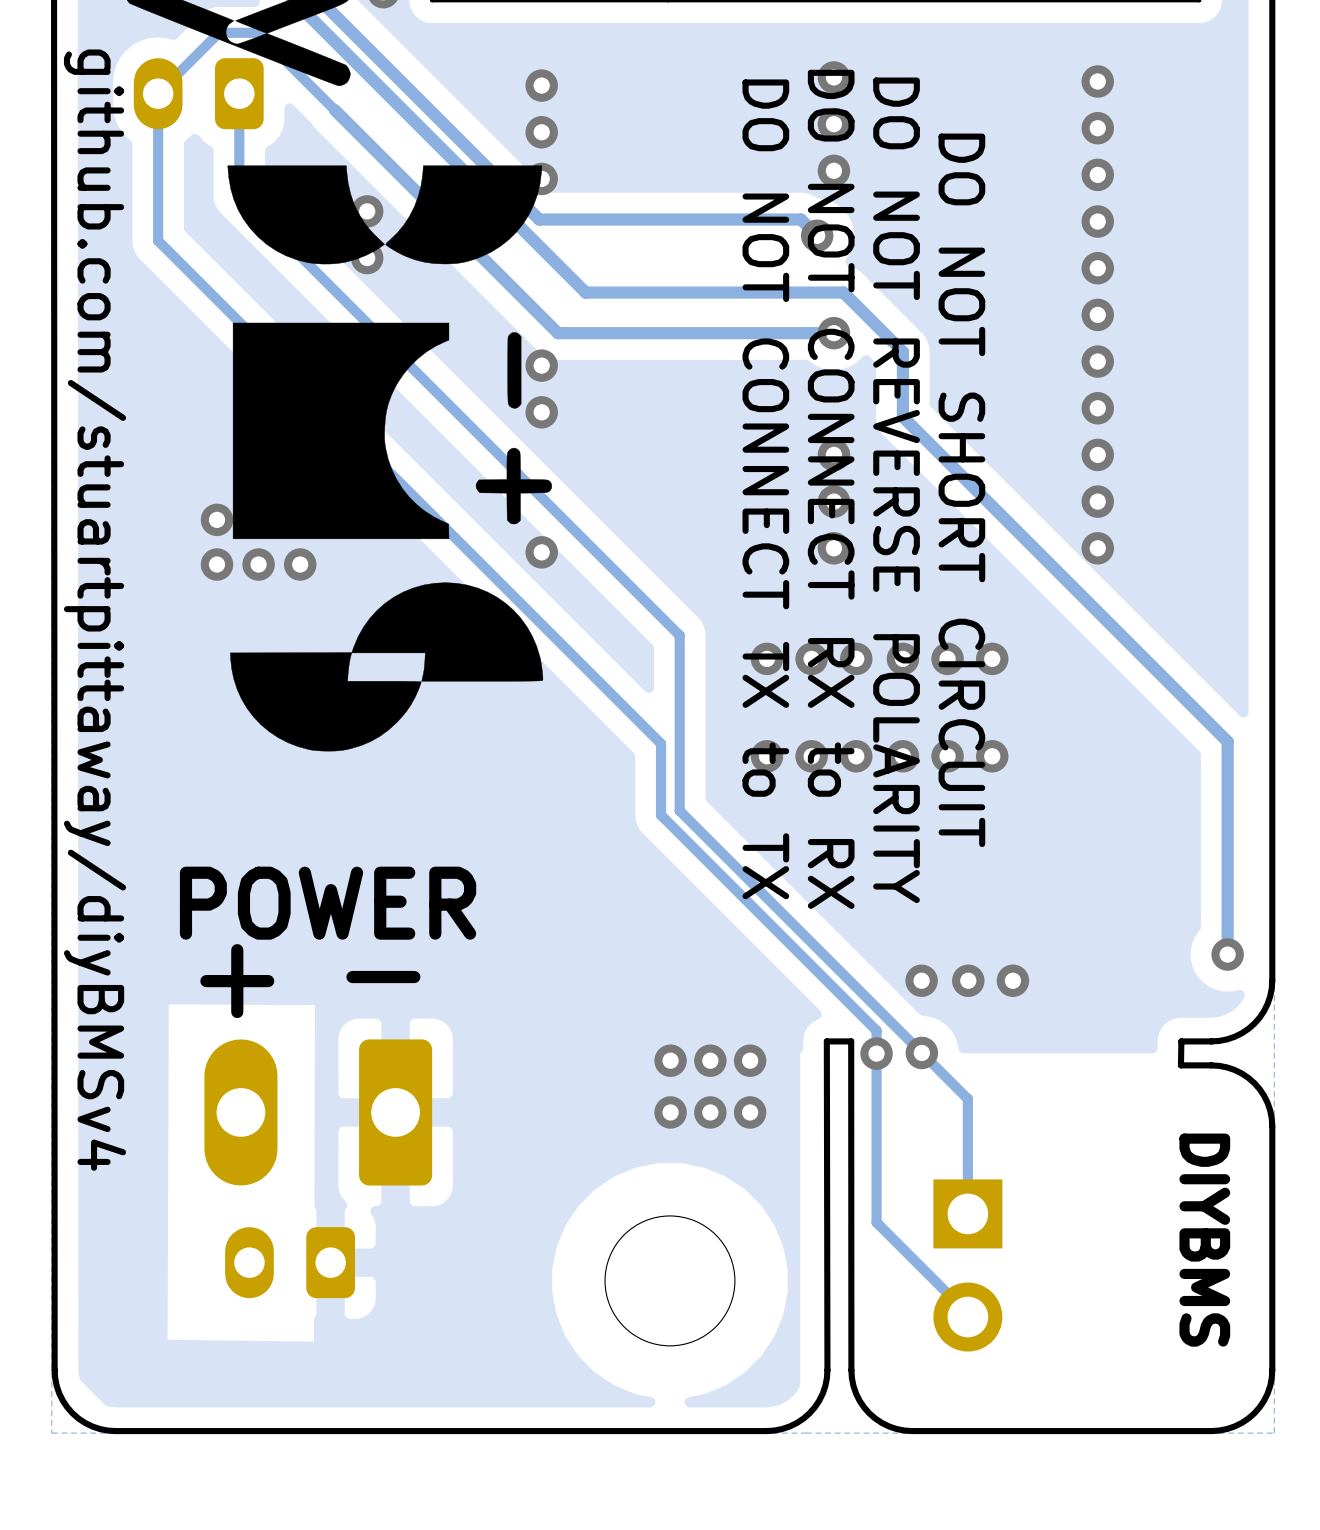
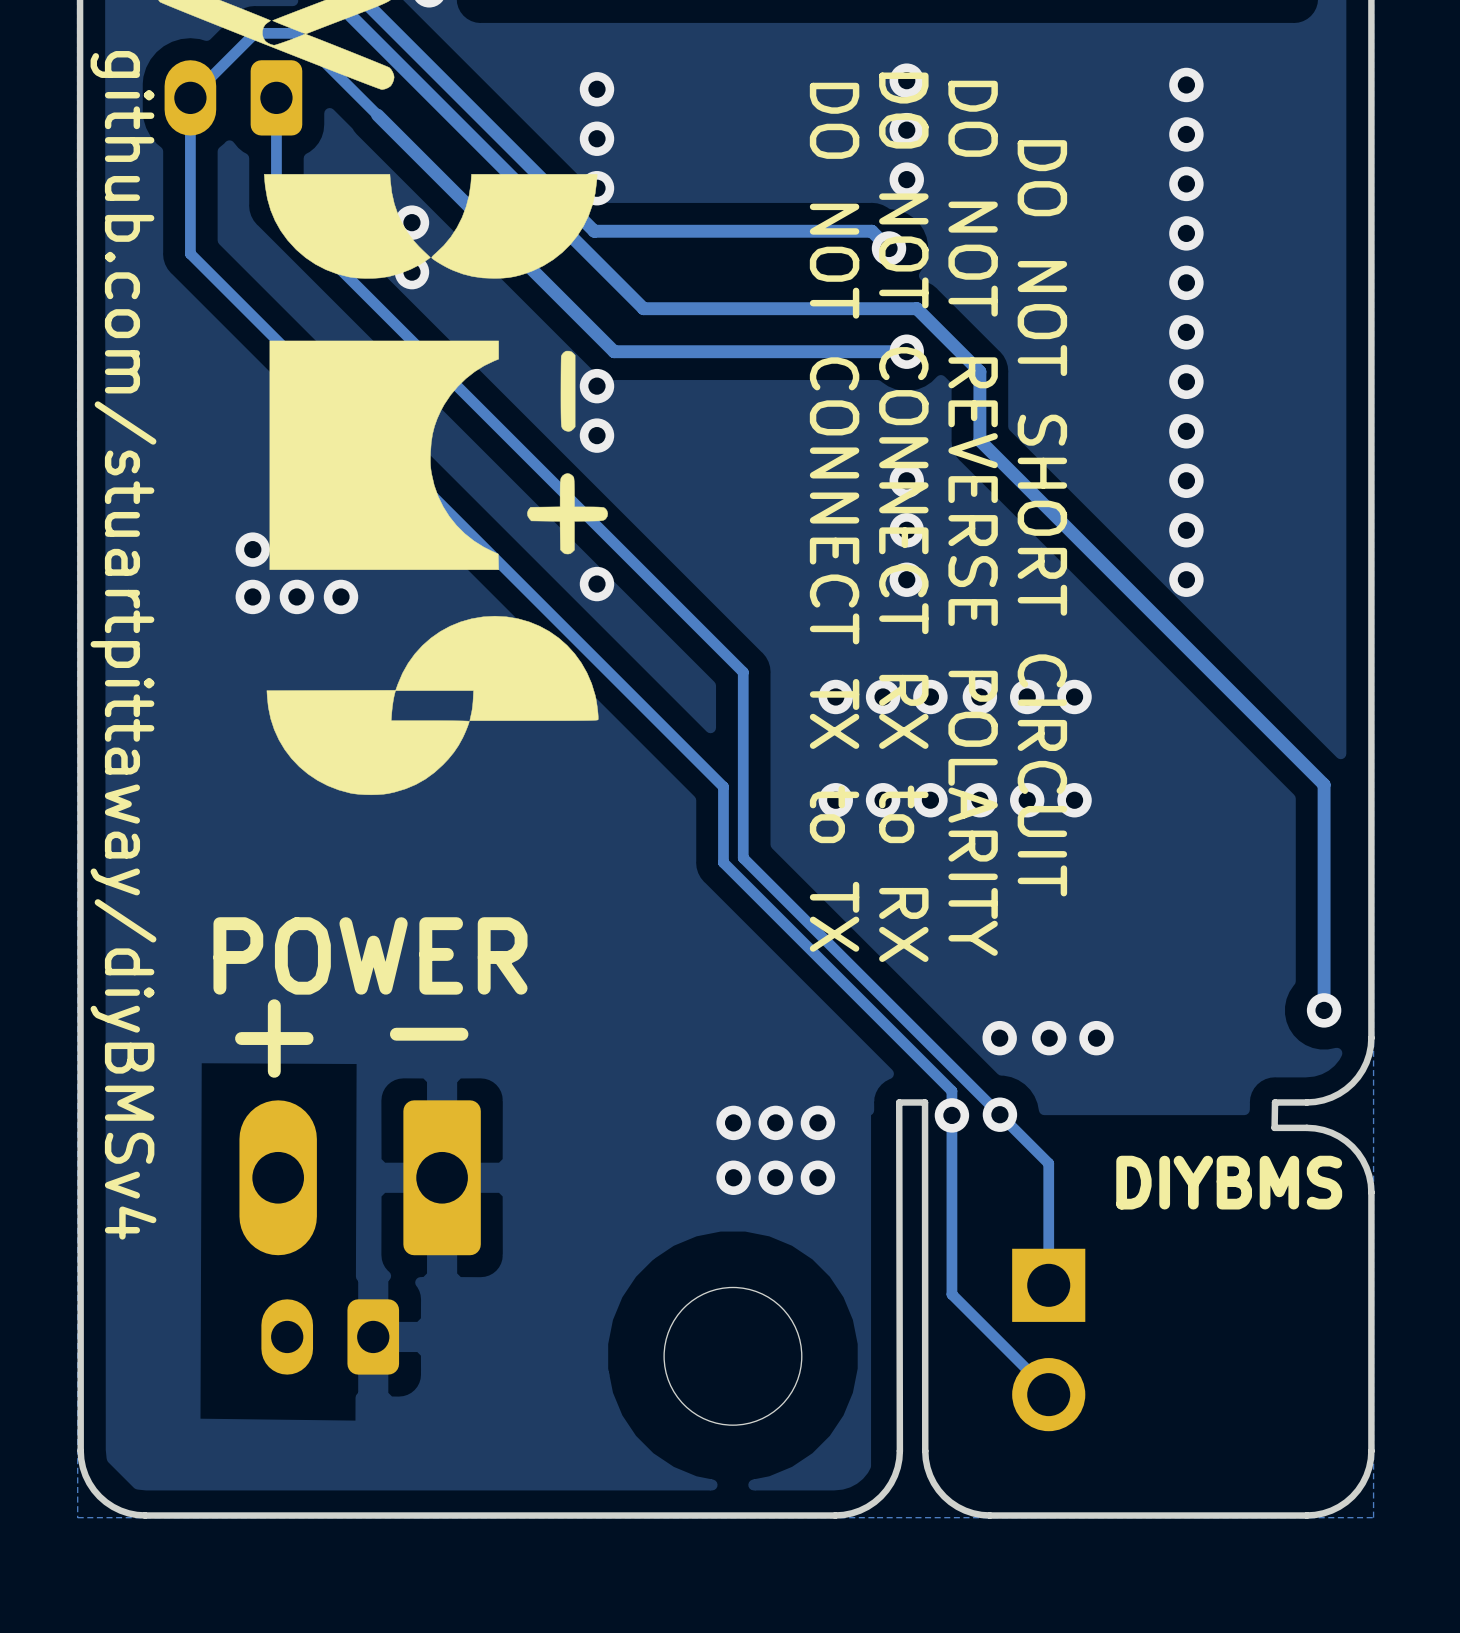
text rotation: 0° (1204, 1240) -> 90° counterclockwise (1229, 1182)

